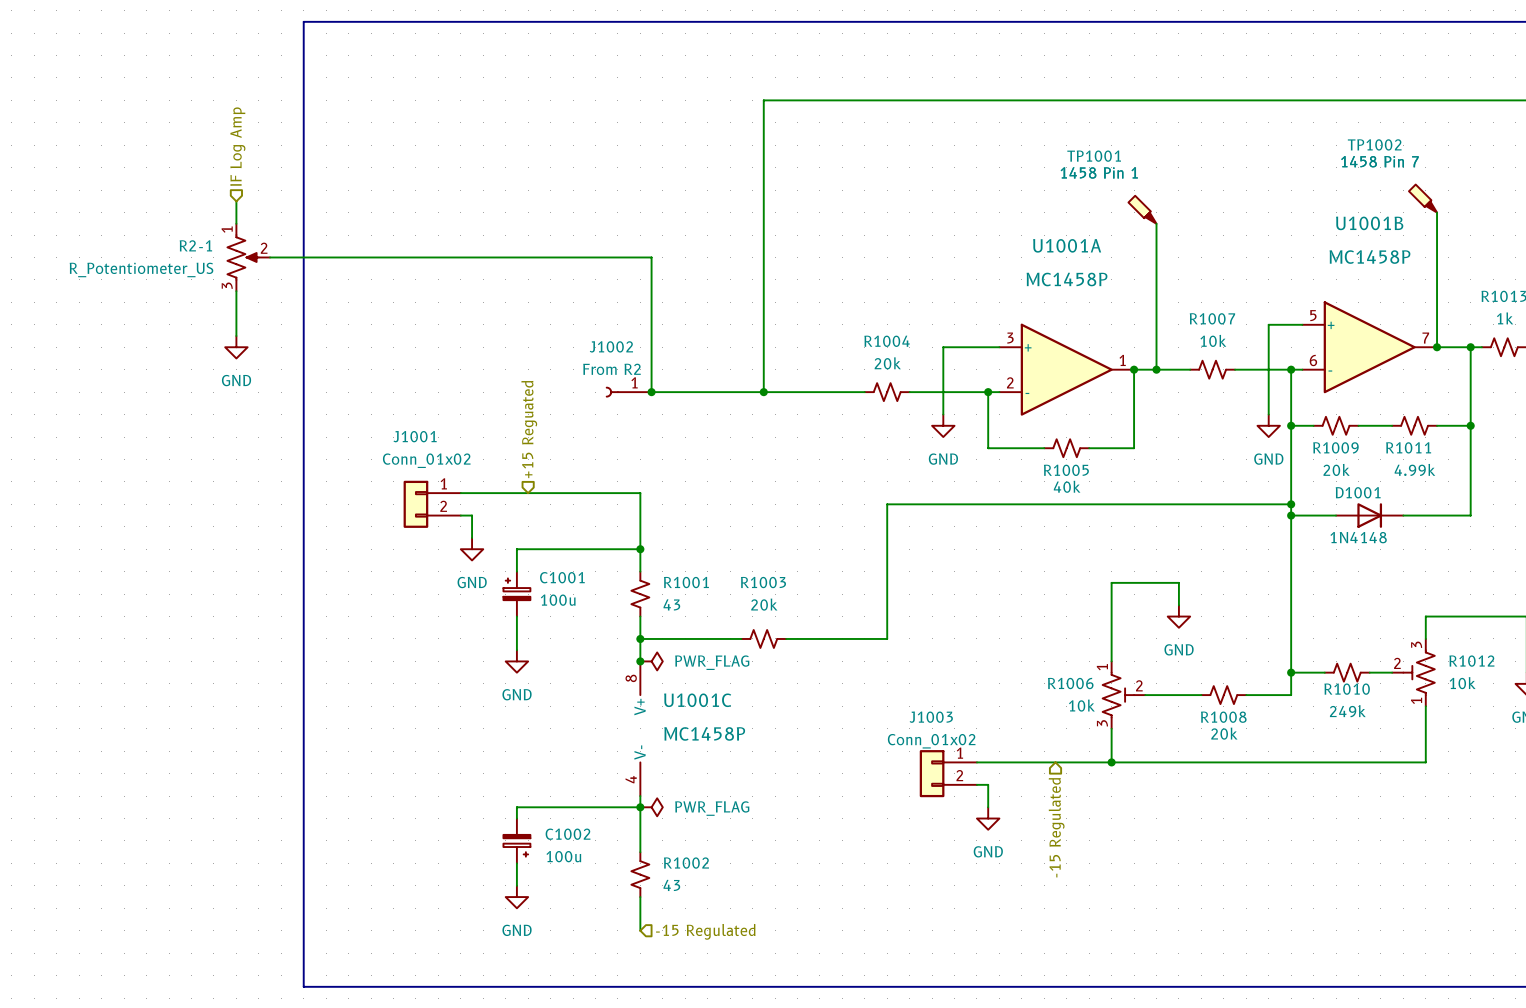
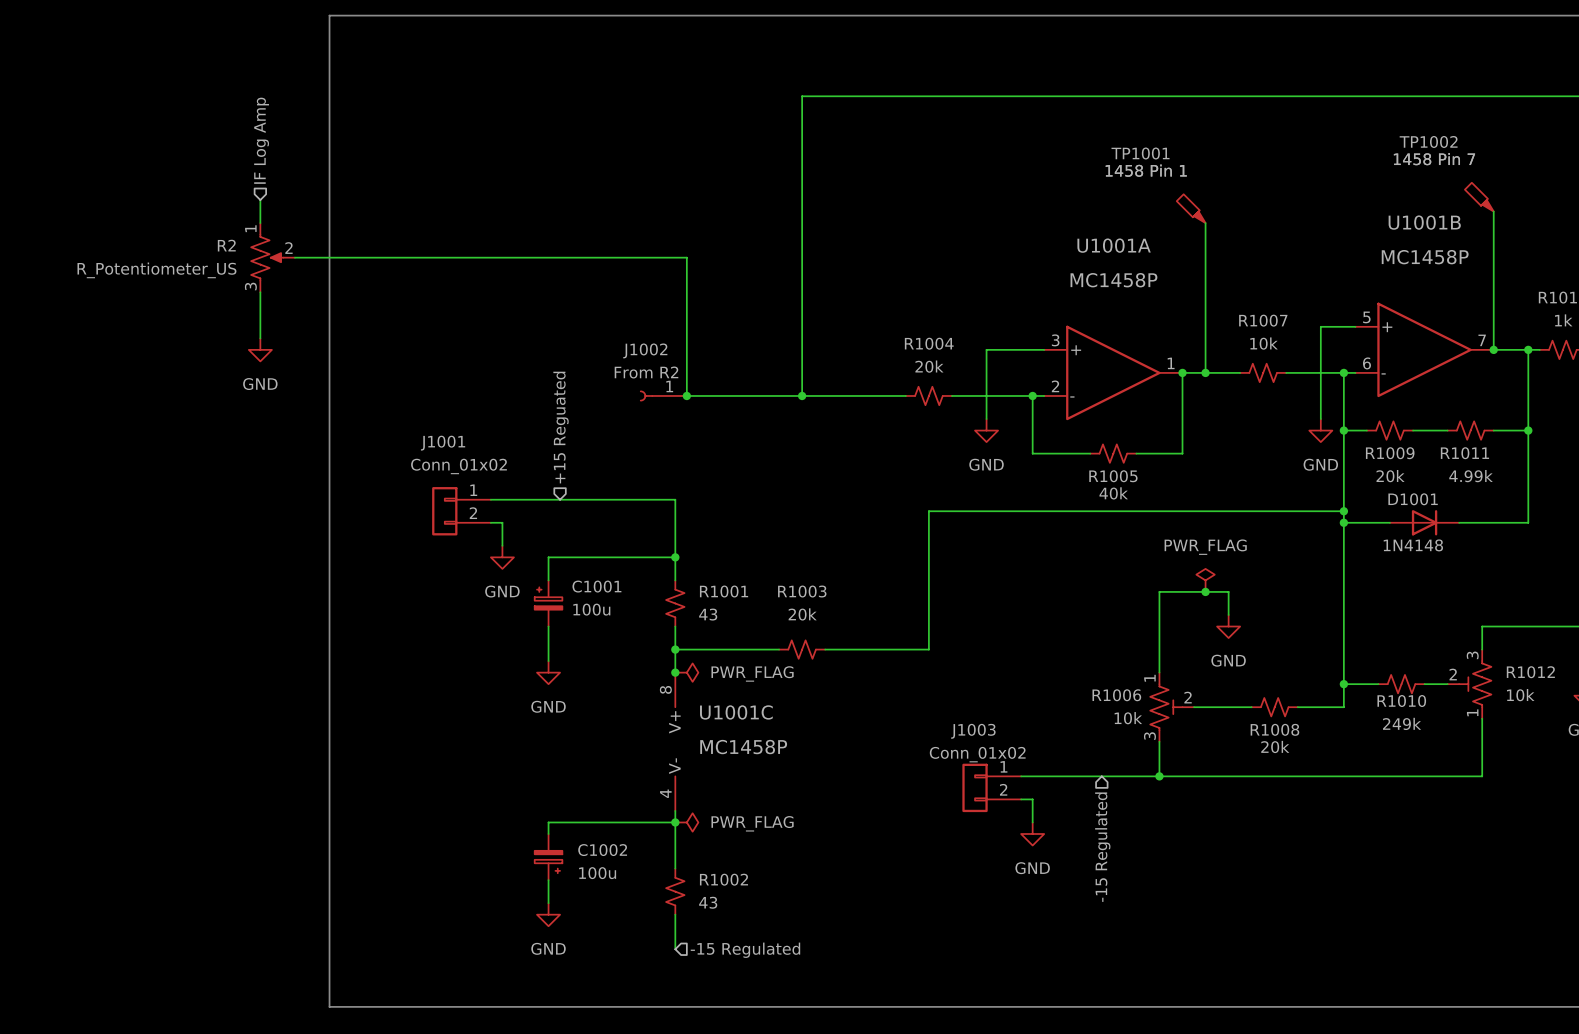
R2-1 name: R2-1 (195, 245) -> R2 (226, 245)
power symbol: none -> PWR_FLAG (1205, 580)
junction: none -> (1205, 591)

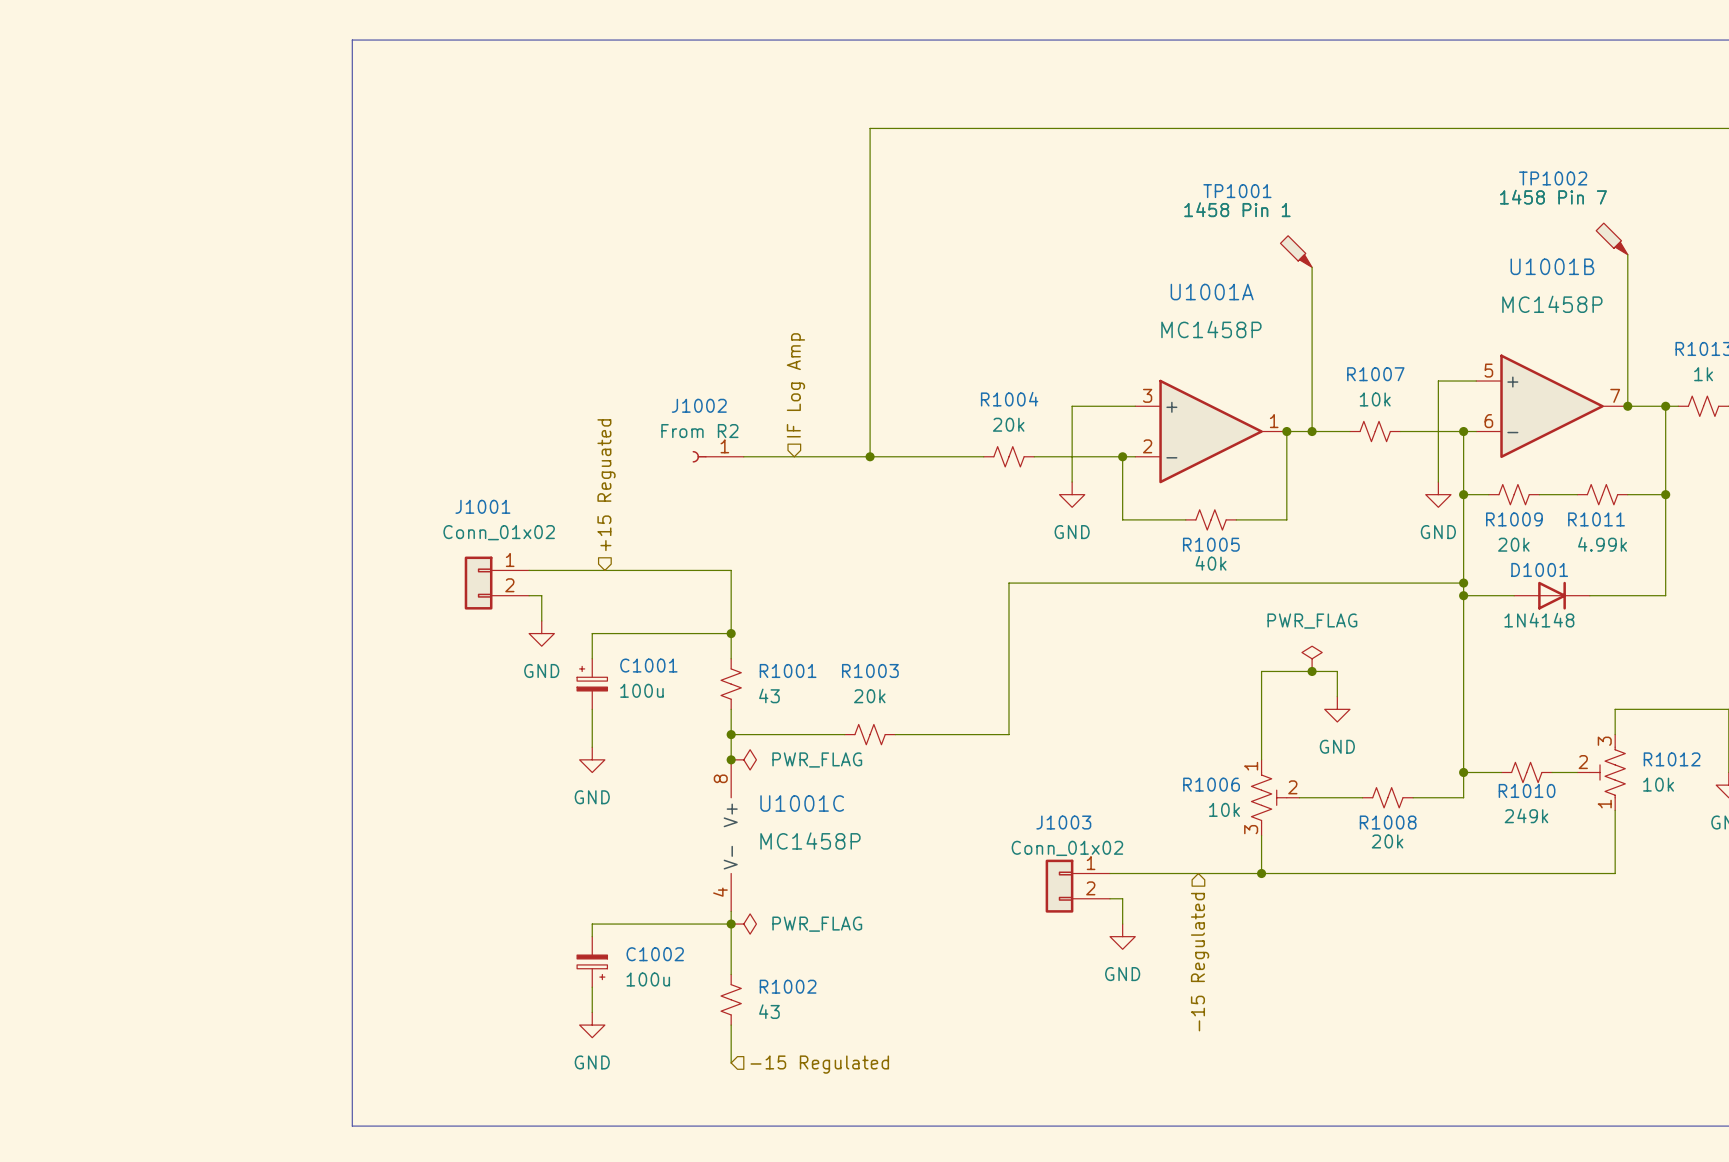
hierarchical label: IF Log Amp (261, 140) -> none
wire: (260, 200) (260, 223) -> none
R2: R_Potentiometer_US (273, 257) -> none
wire: (294, 257) (686, 257) (686, 395) -> none
wire: (260, 292) (260, 338) -> none
hierarchical label: none -> IF Log Amp (795, 385)
power symbol: GND (260, 349) -> none
junction: (686, 395) -> none

